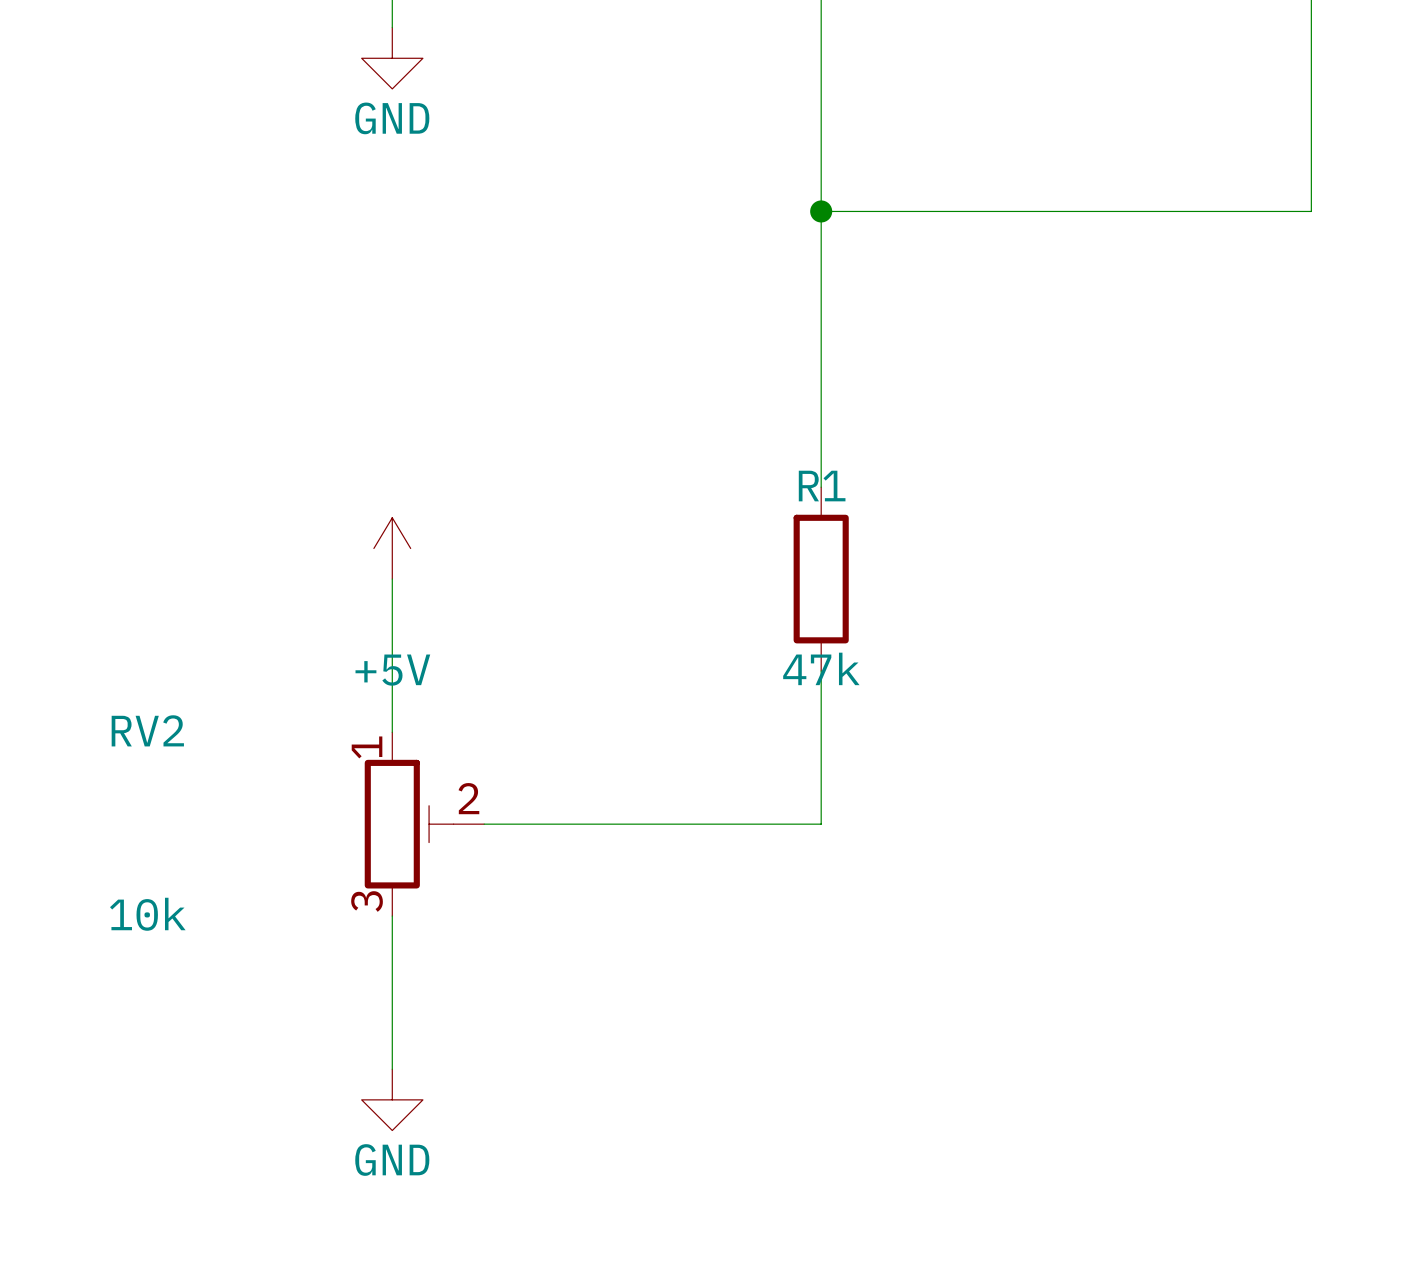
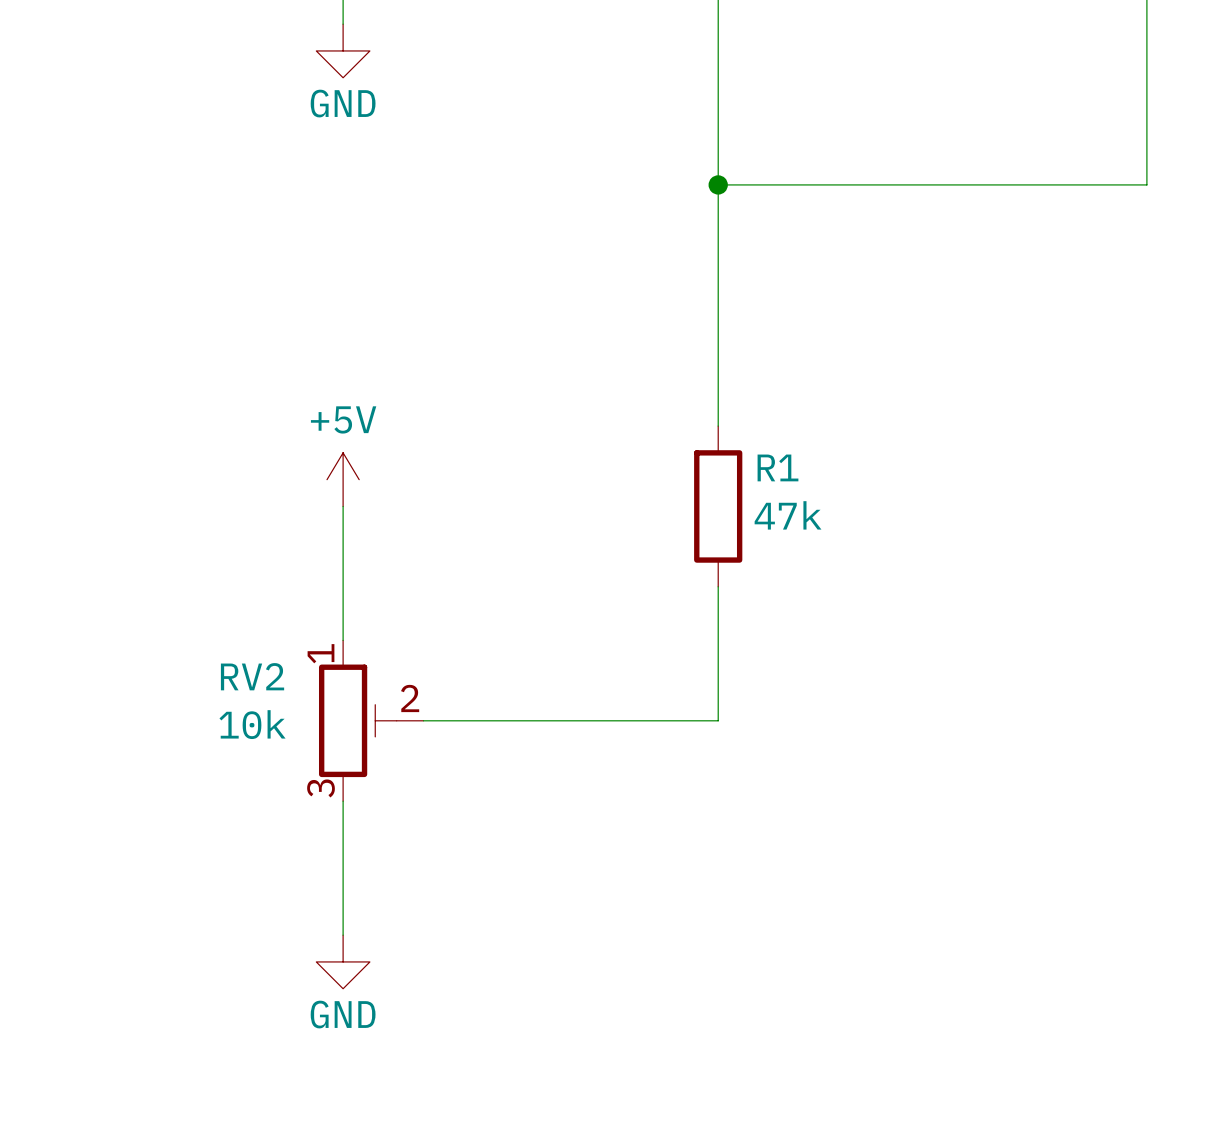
R1 name position: R1 (822, 486) -> R1 (777, 467)
R1 value position: 47k (821, 668) -> 47k (788, 515)
power symbol text position: +5V (392, 670) -> +5V (343, 419)
RV2 name position: RV2 (147, 730) -> RV2 (252, 676)
RV2 value position: 10k (147, 914) -> 10k (252, 724)

